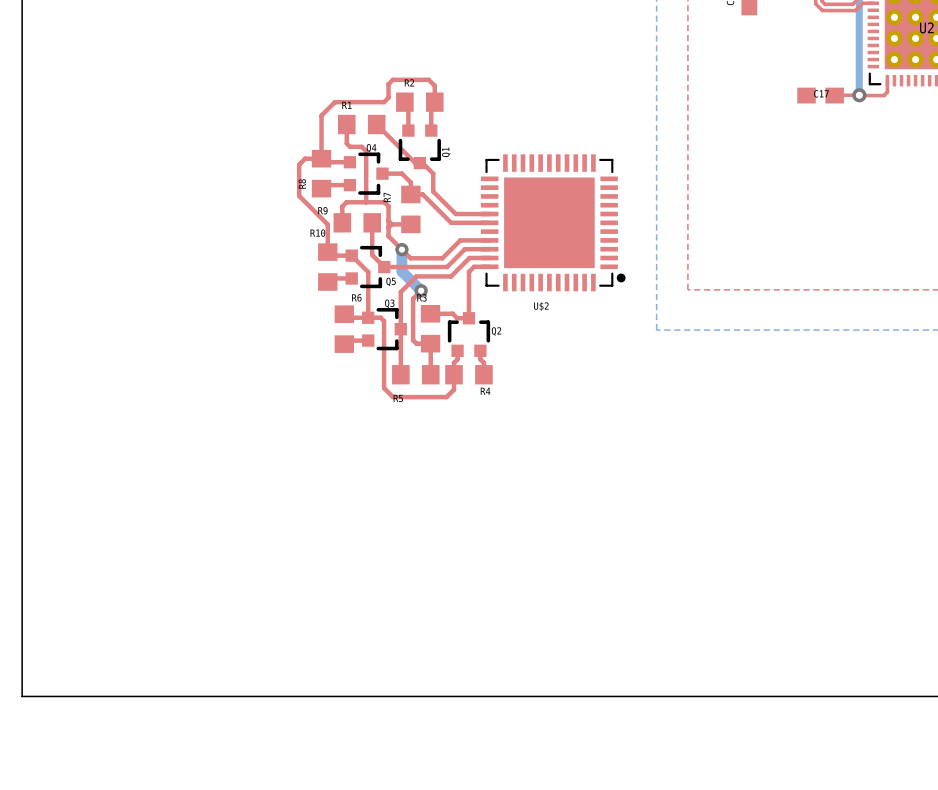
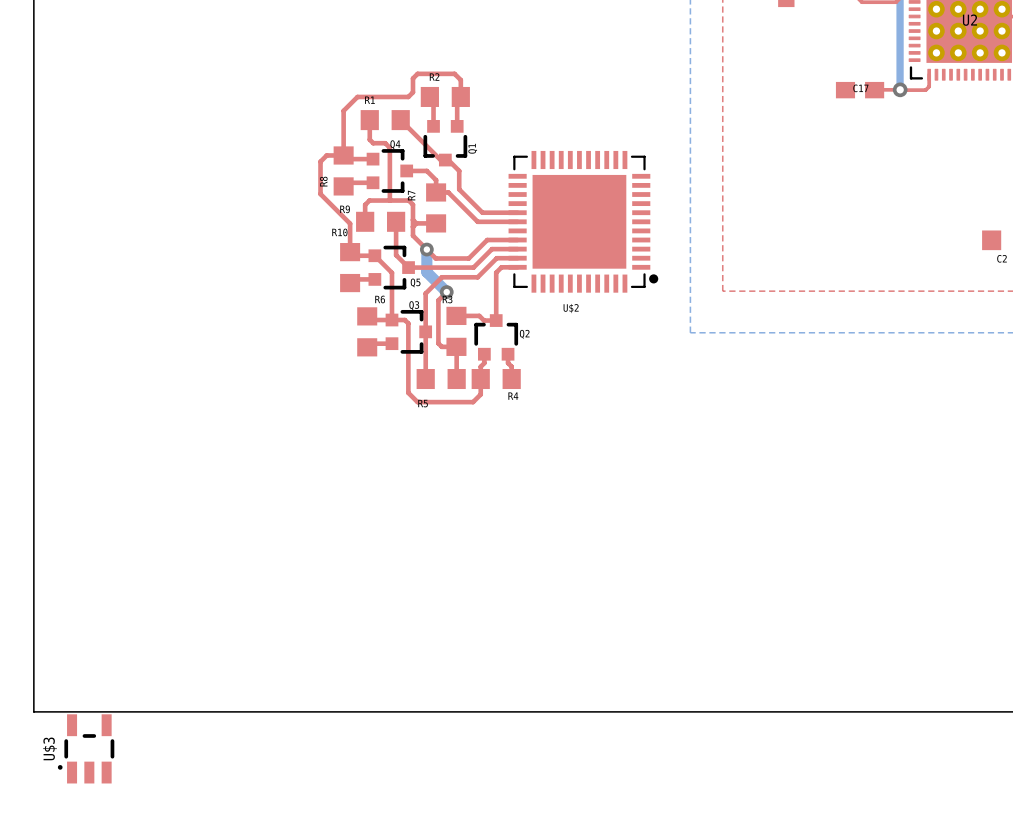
U$3: none -> (86, 748)

